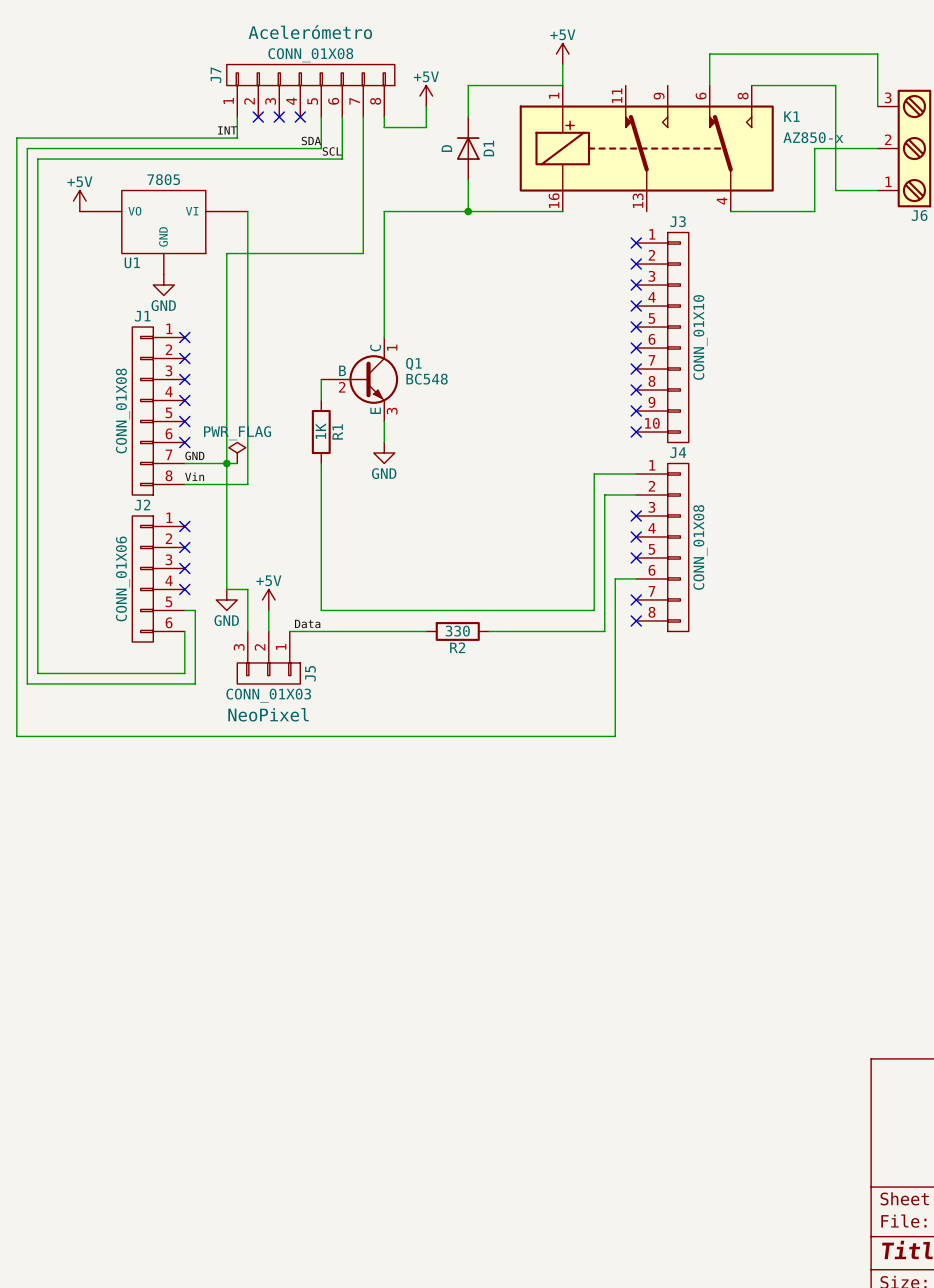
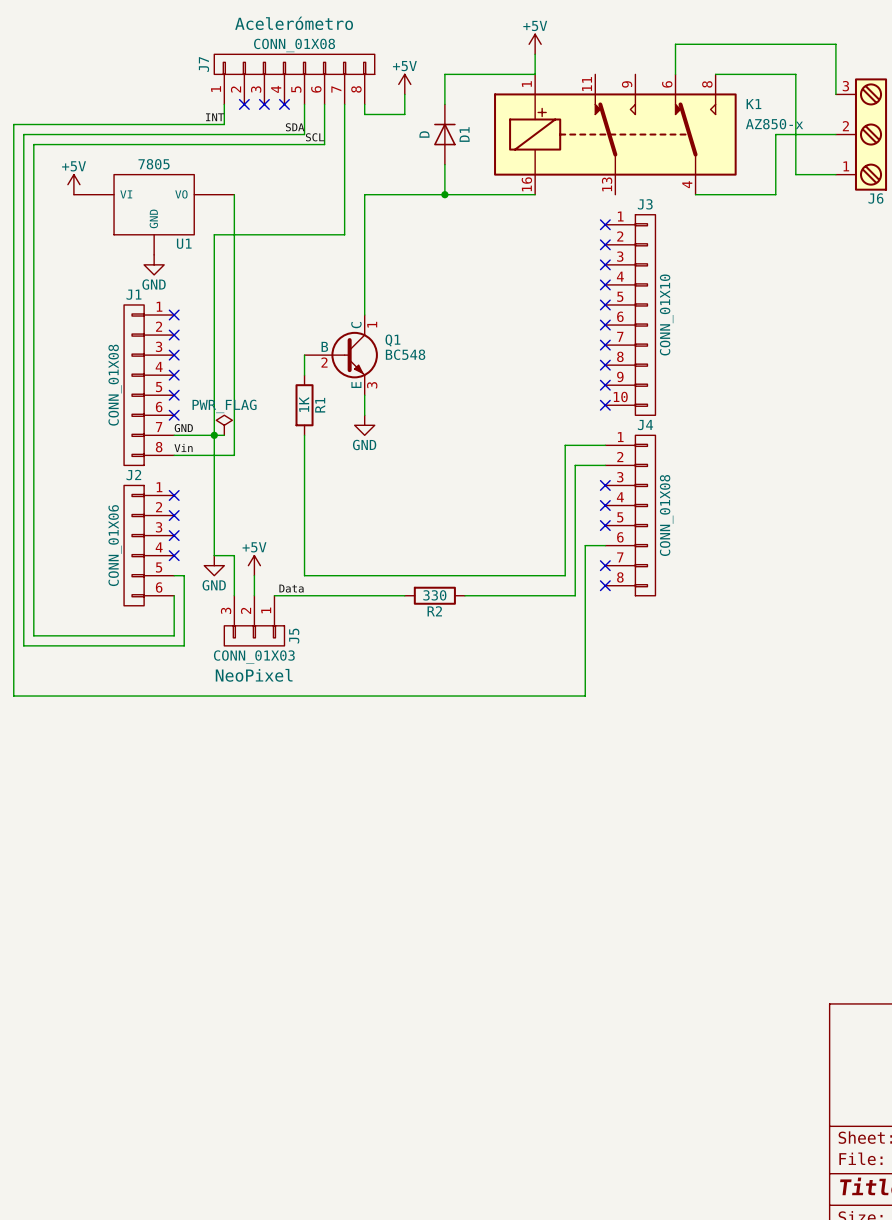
U1 flip: as is (163, 222) -> left-right (154, 204)

